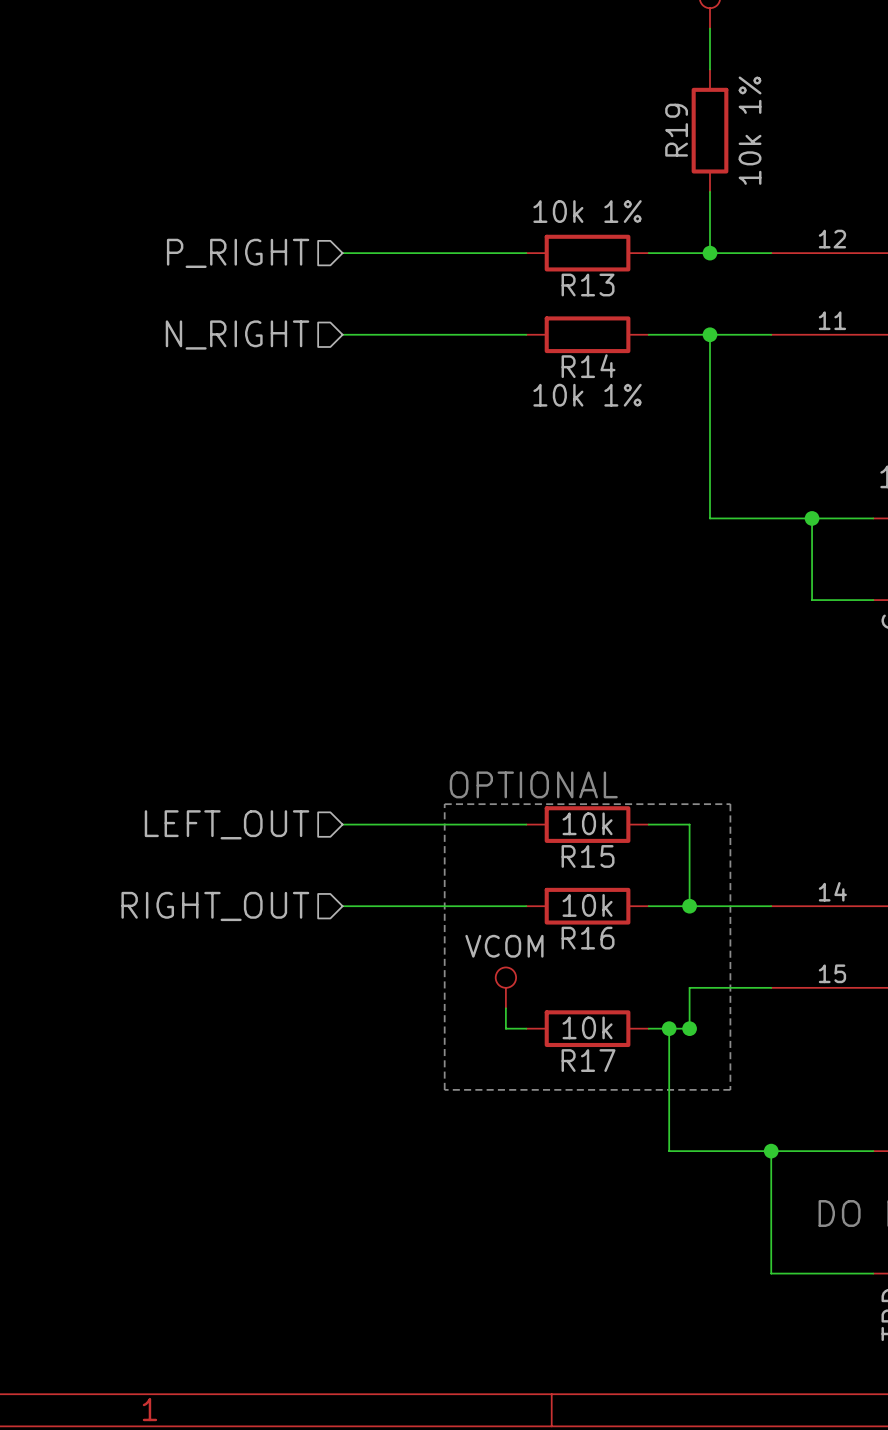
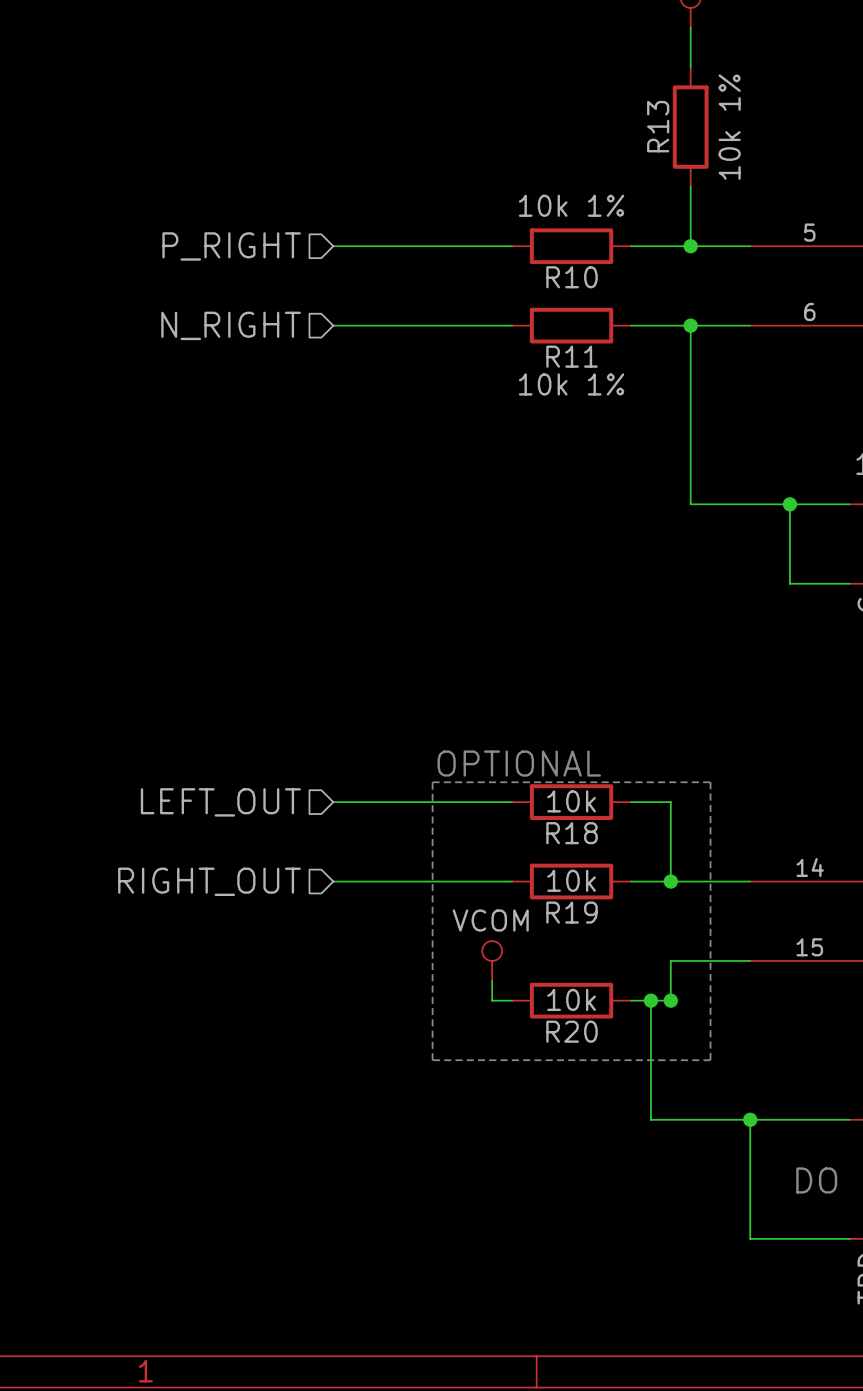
R19 name: R19 (676, 130) -> R13 (658, 126)
part pin number: 12 (832, 239) -> 5 (809, 232)
R13 name: R13 (588, 285) -> R10 (572, 277)
part pin number: 11 (832, 320) -> 6 (809, 311)
R14 name: R14 (588, 366) -> R11 (572, 356)
R15 name: R15 (588, 856) -> R18 (572, 833)
R16 name: R16 (588, 938) -> R19 (572, 912)
R17 name: R17 (588, 1060) -> R20 (572, 1031)

